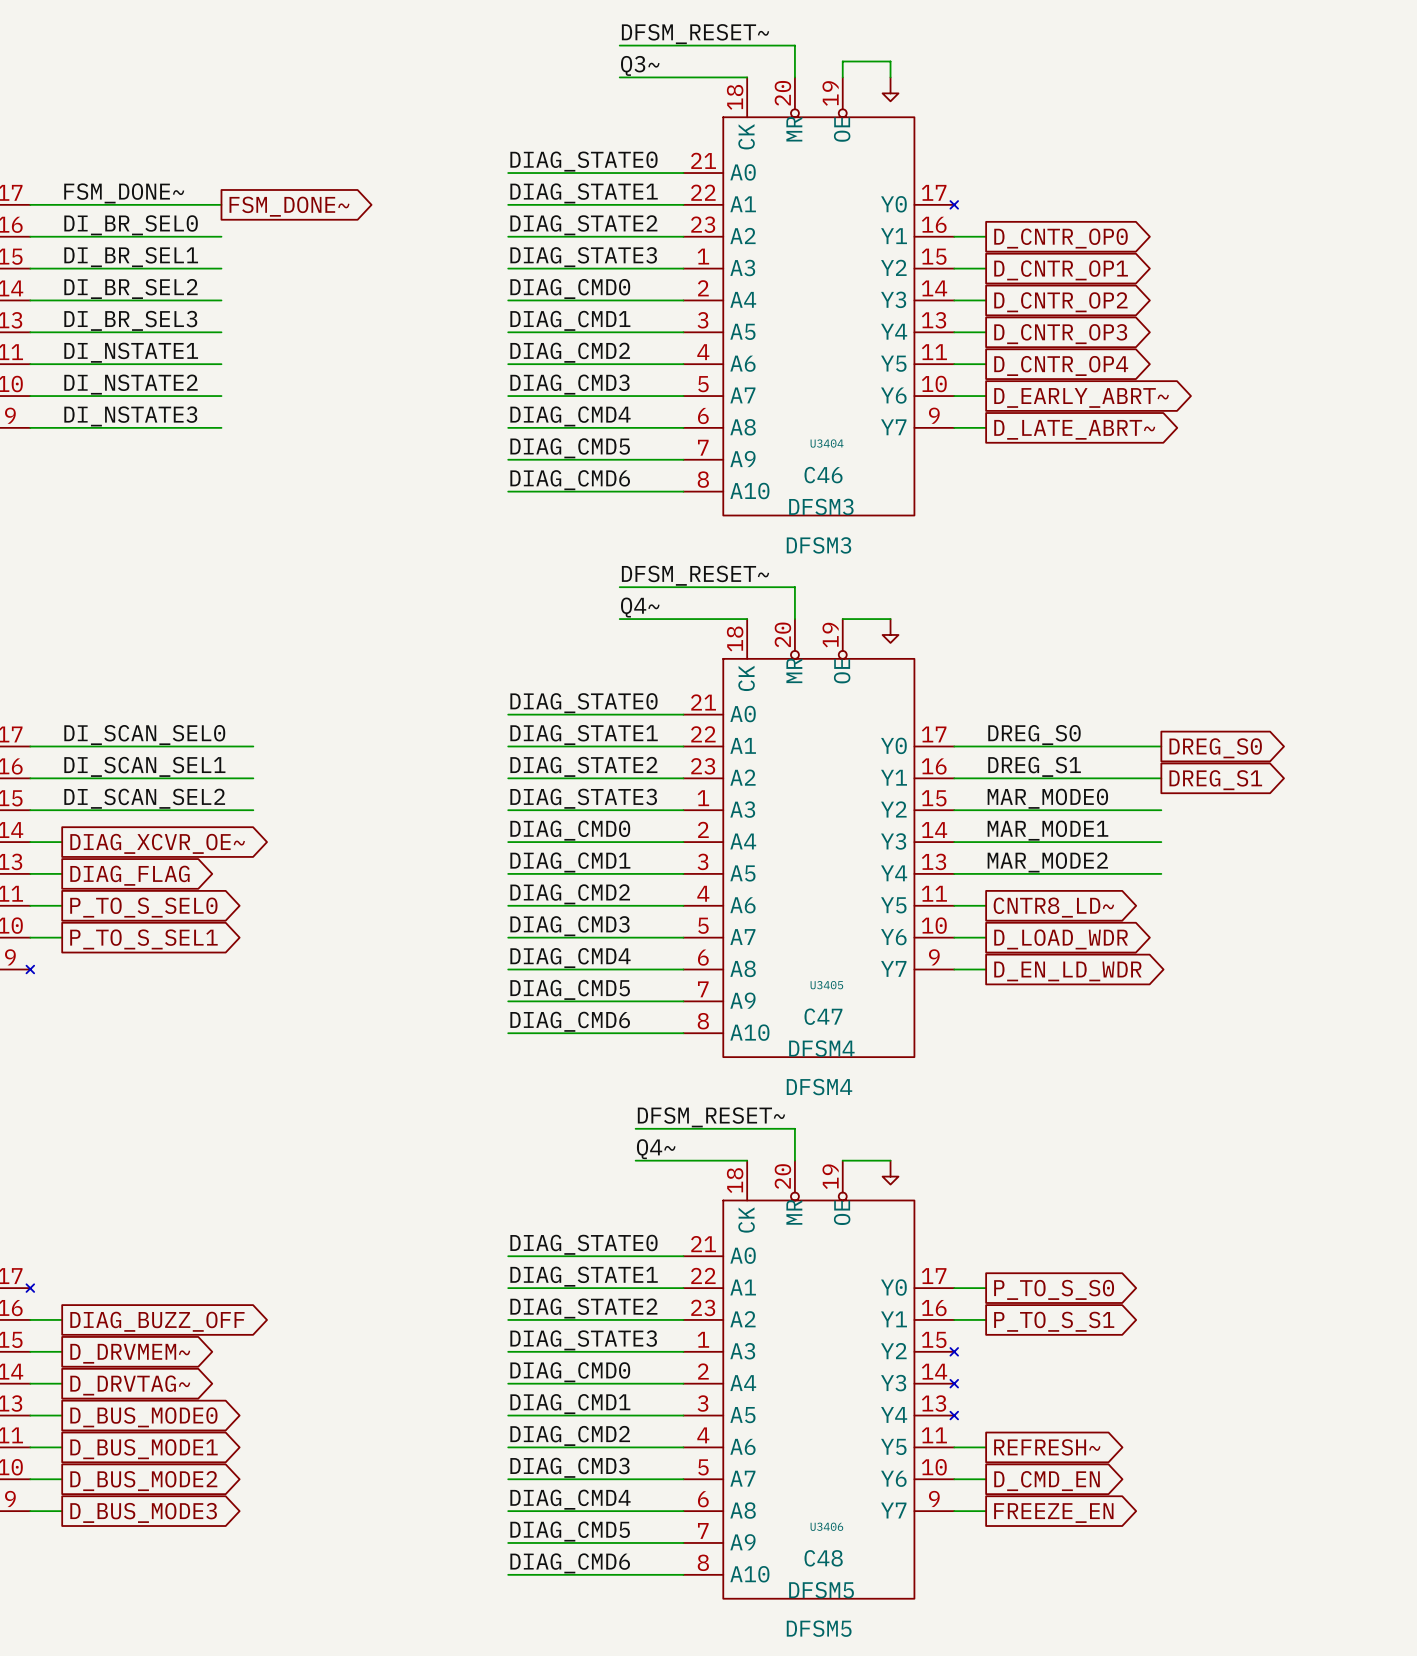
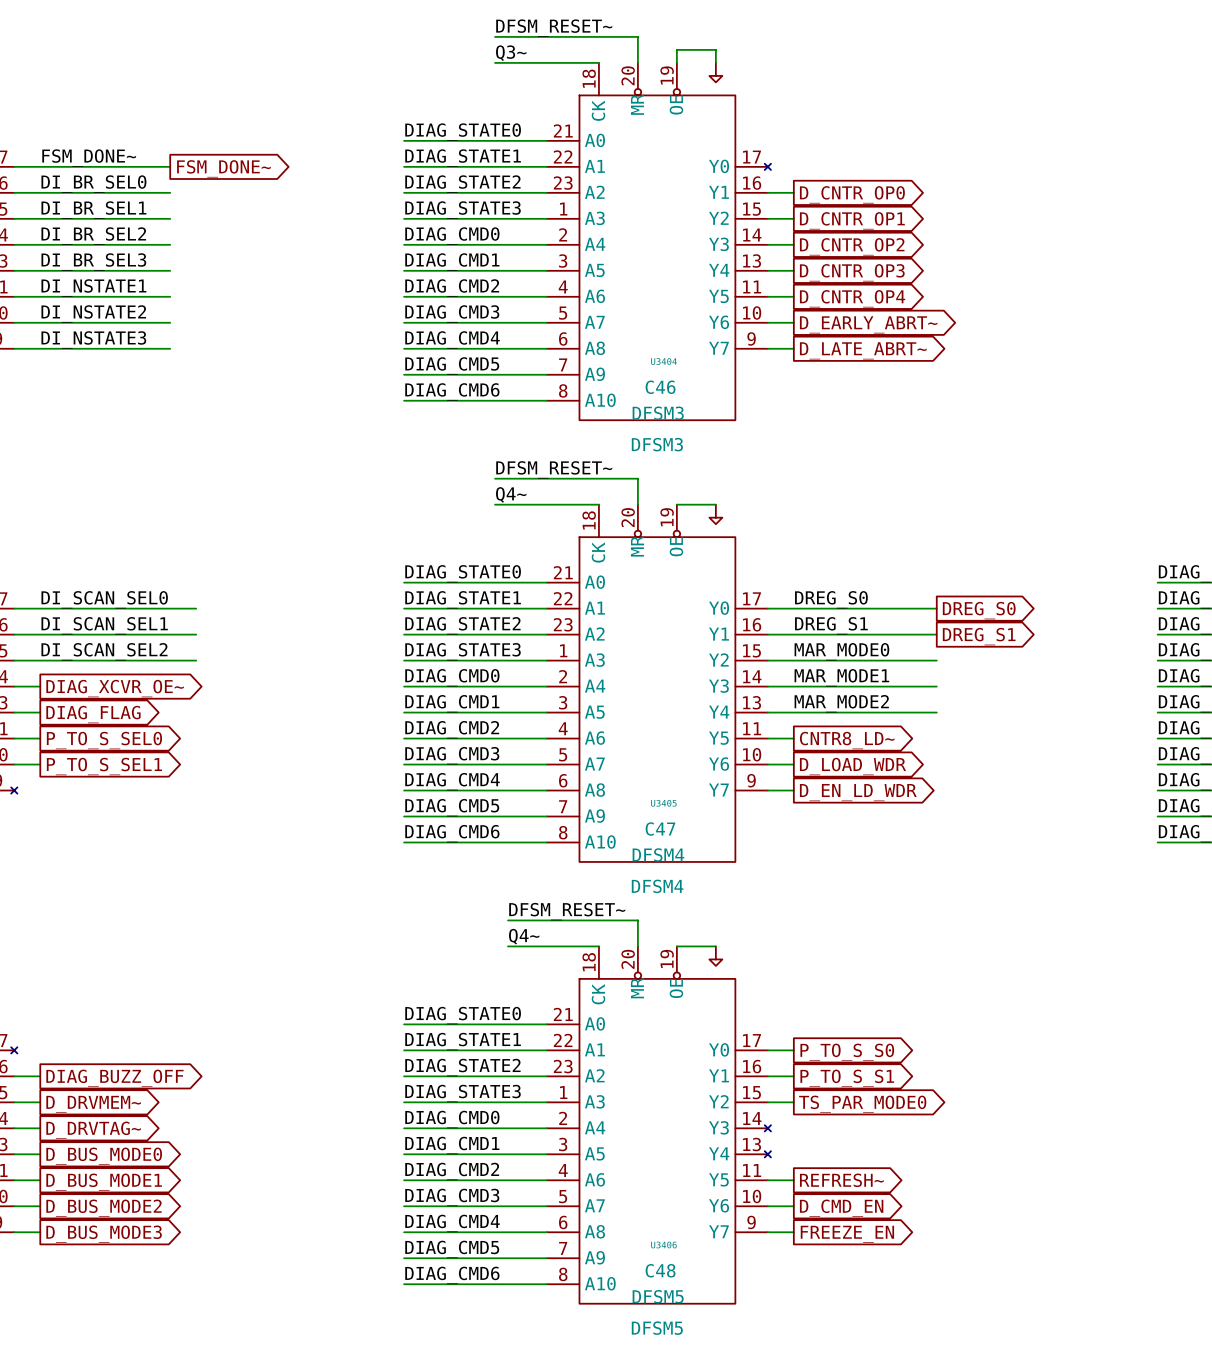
wire: none -> (767, 1102) (793, 1102)
no-connect mark: (954, 1351) -> none
global label: none -> TS_PAR_MODE0 (862, 1104)

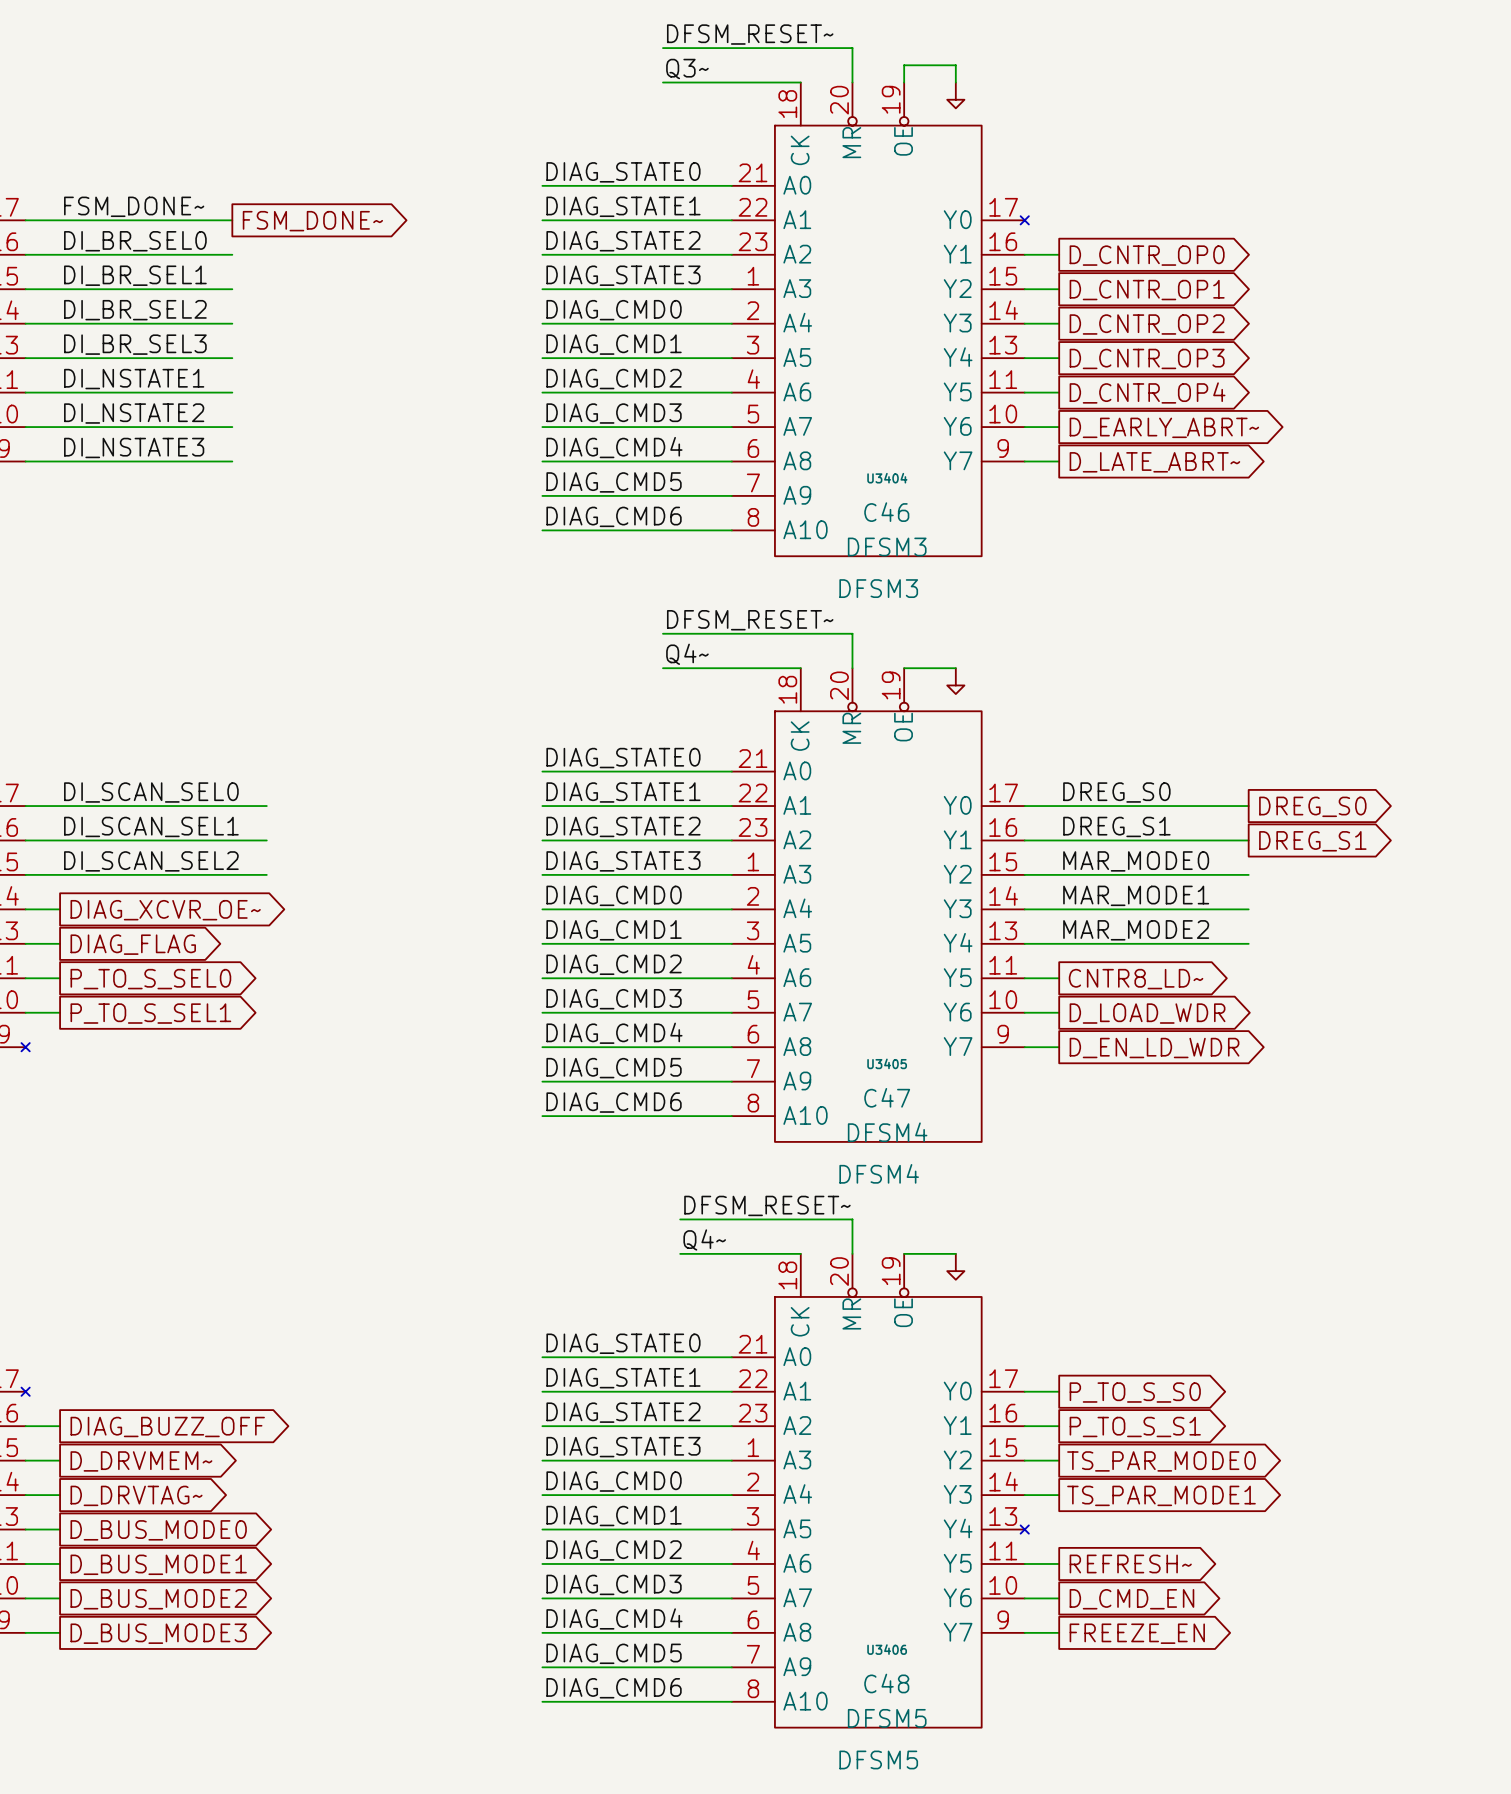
wire: none -> (1024, 1495) (1059, 1495)
no-connect mark: (767, 1128) -> none
global label: none -> TS_PAR_MODE1 (1161, 1495)

